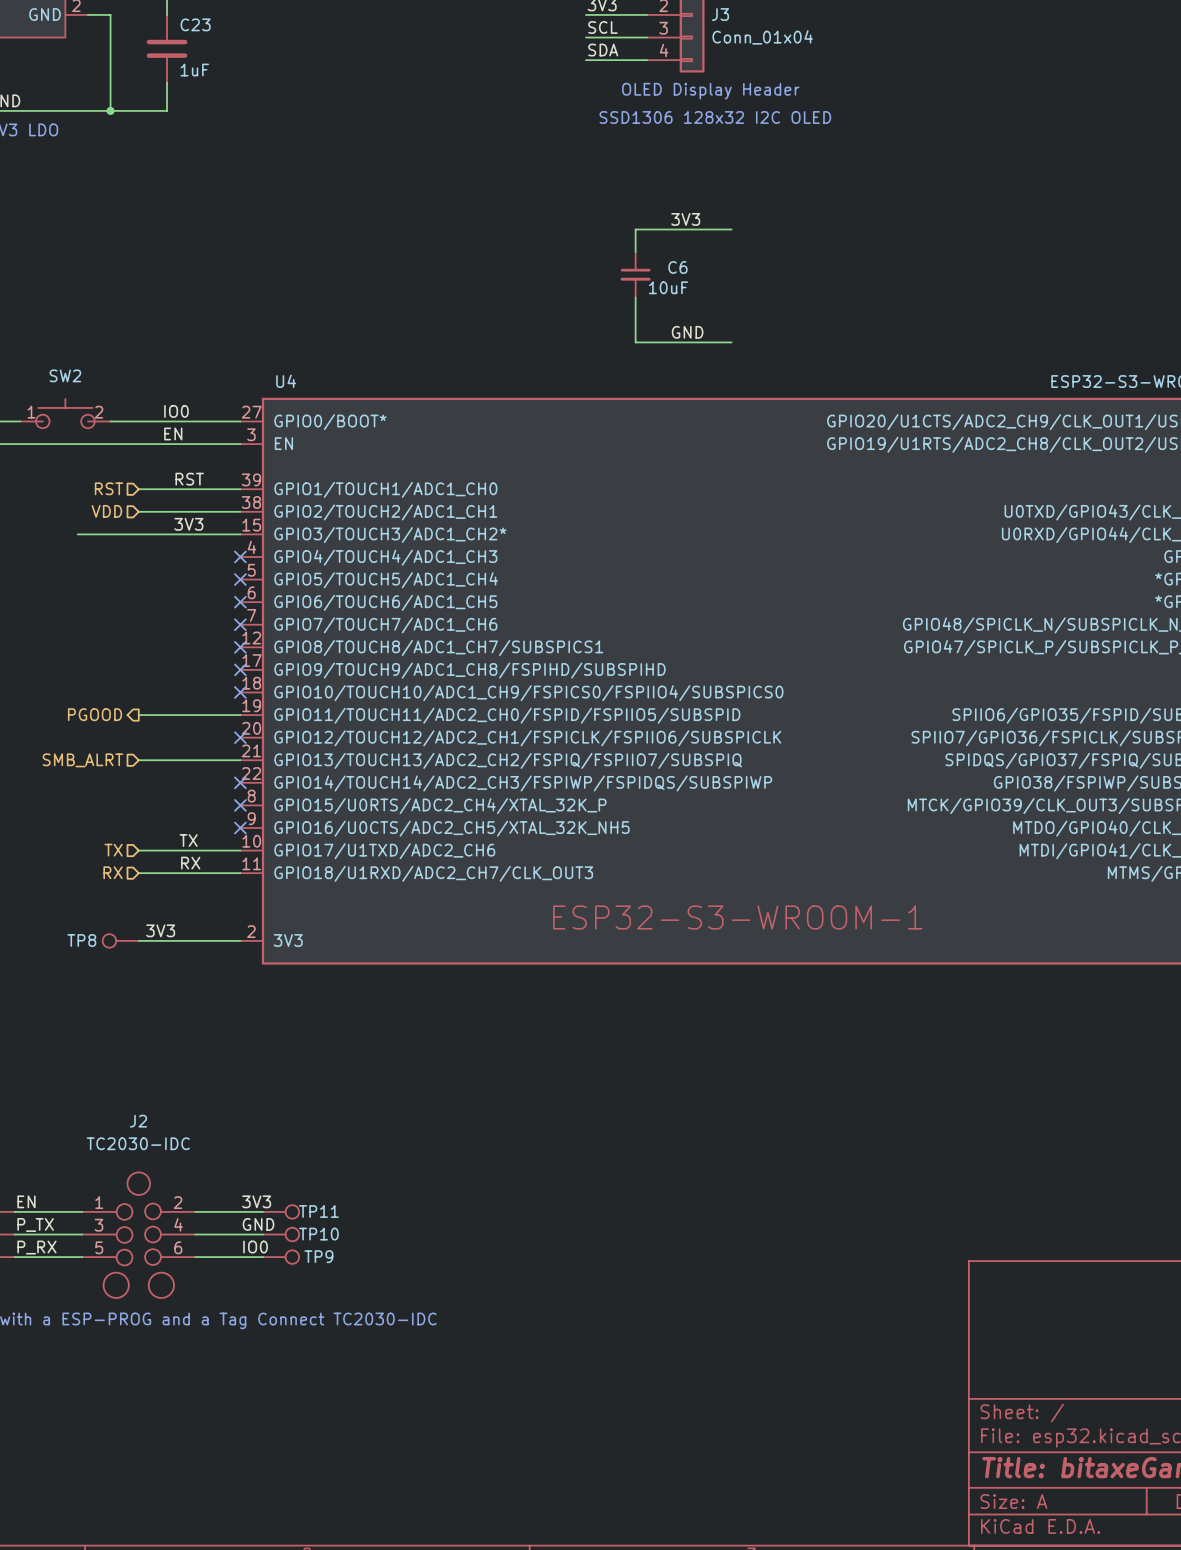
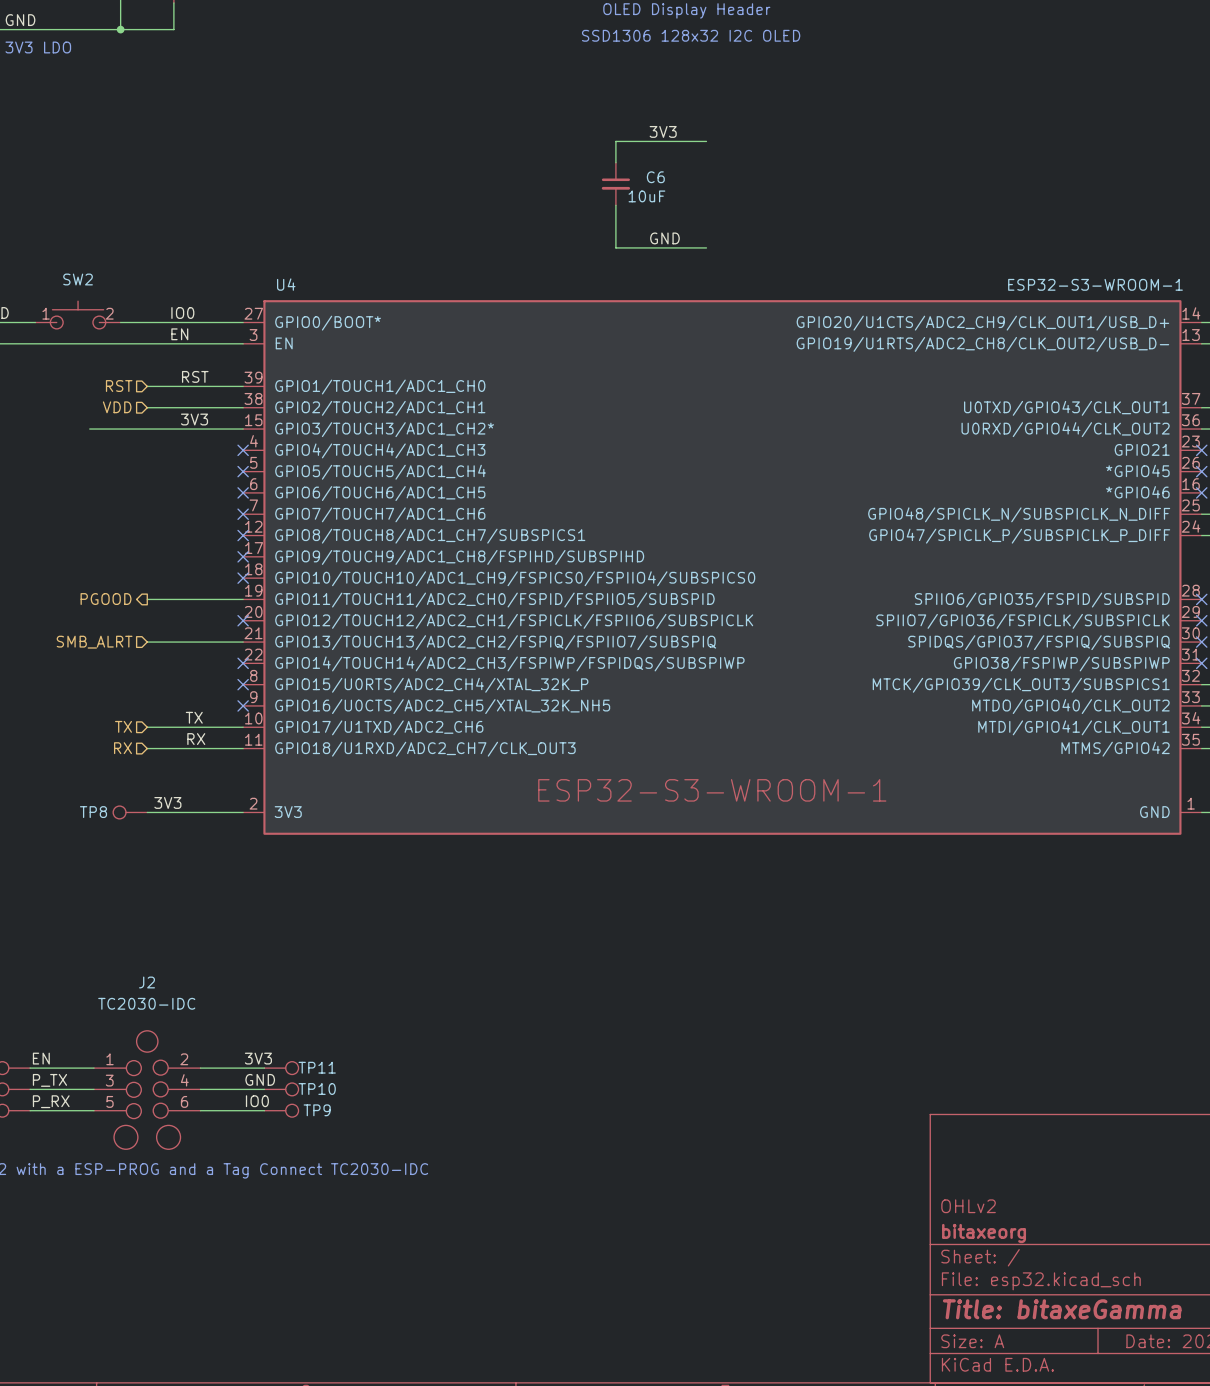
title block: none -> OHLv2 (968, 1206)
title block: none -> bitaxeorg (984, 1233)

